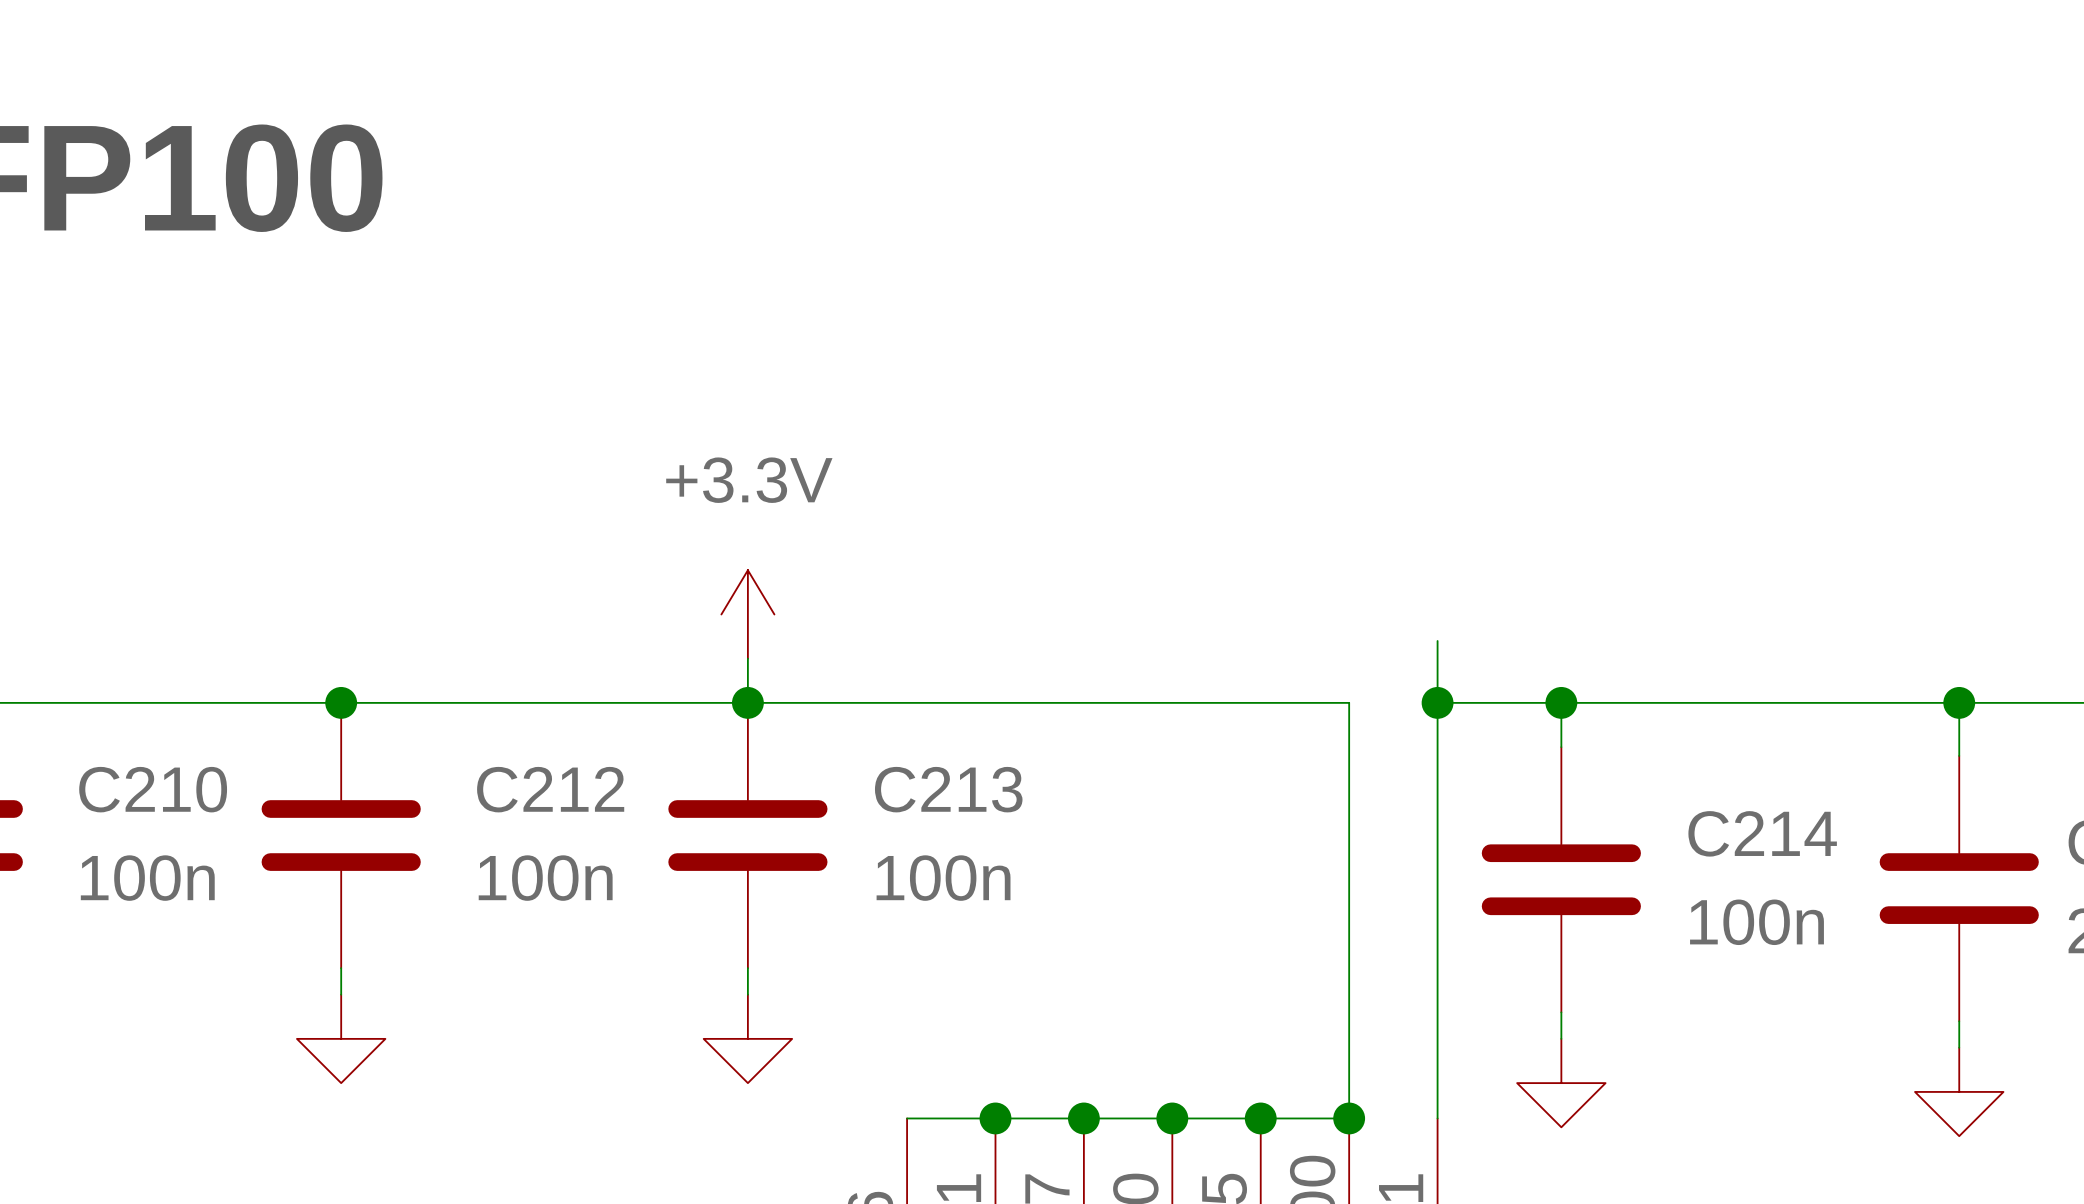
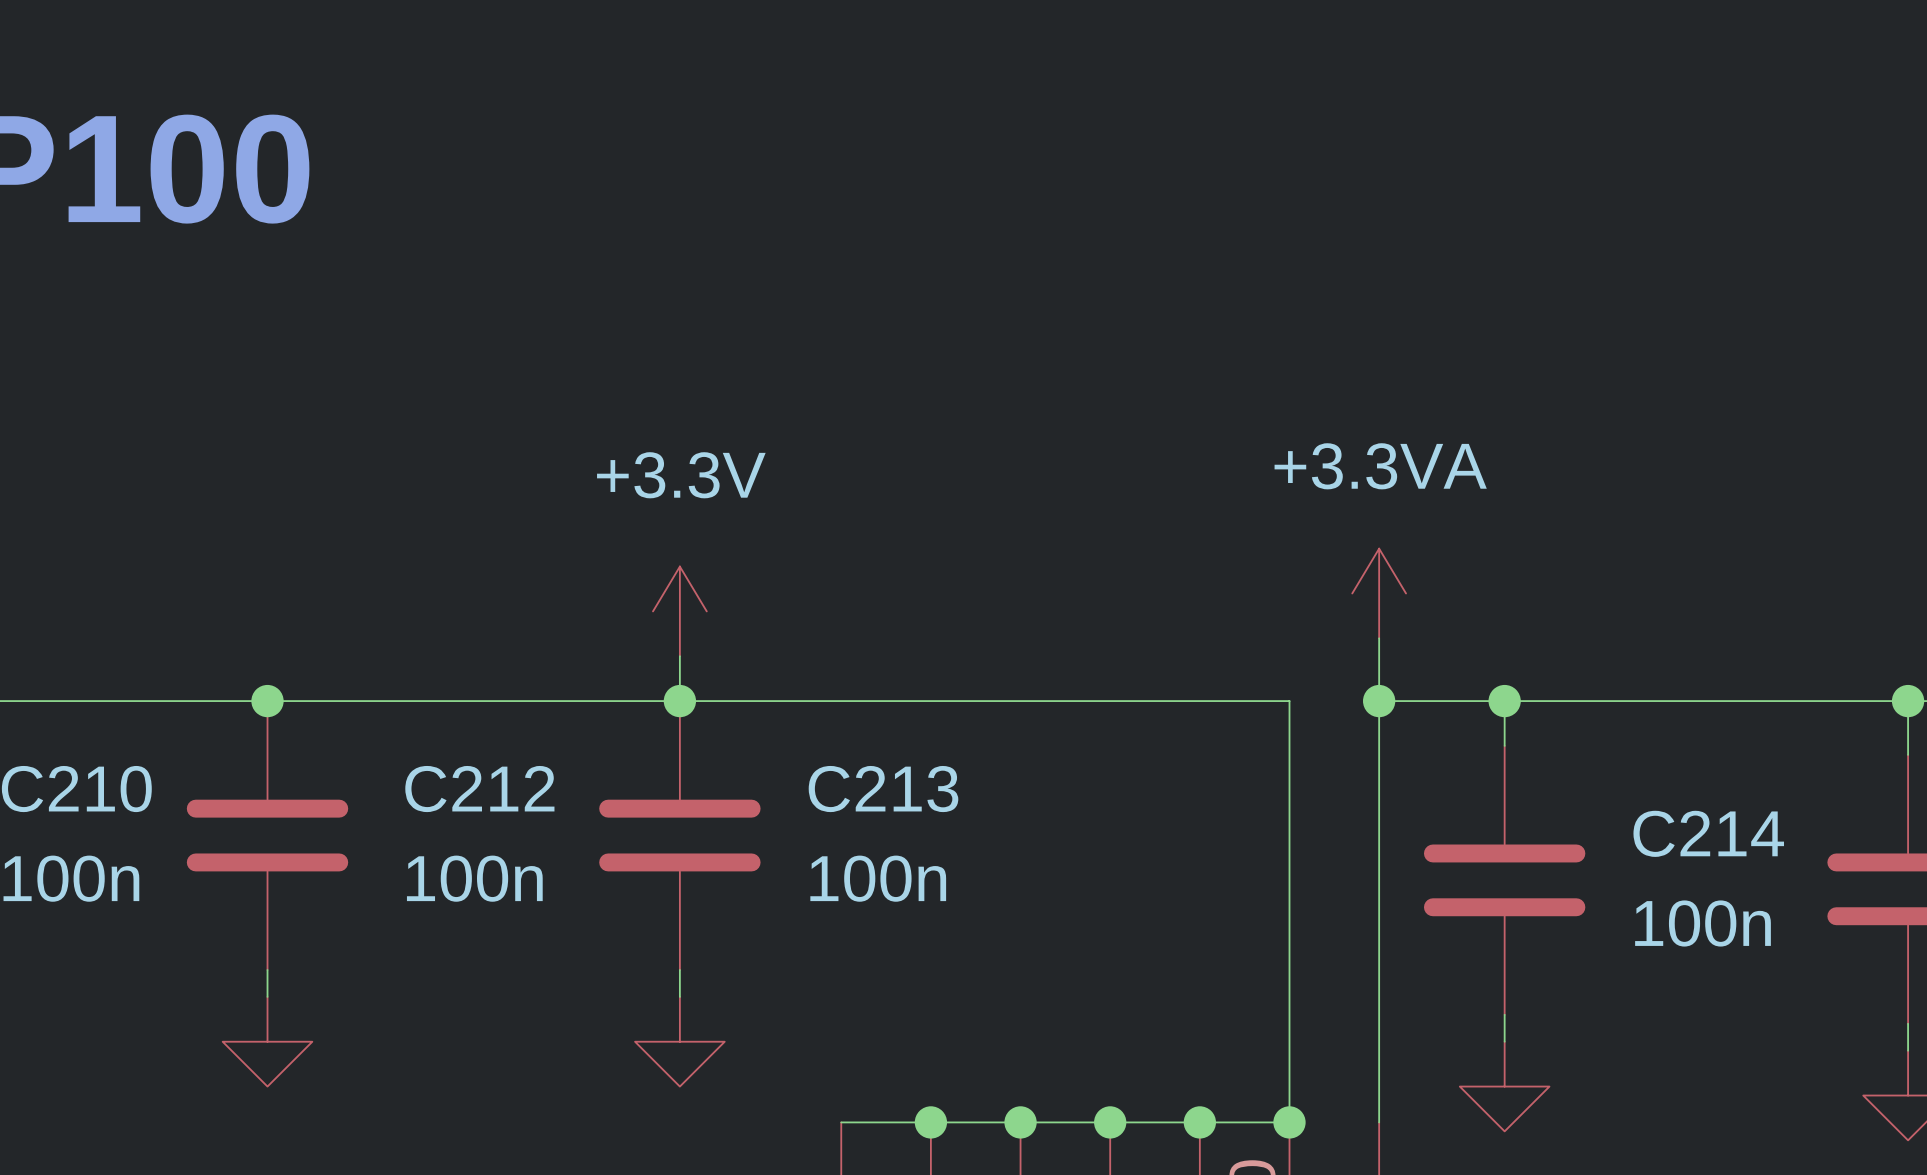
power symbol: none -> +3.3VA (1379, 593)

